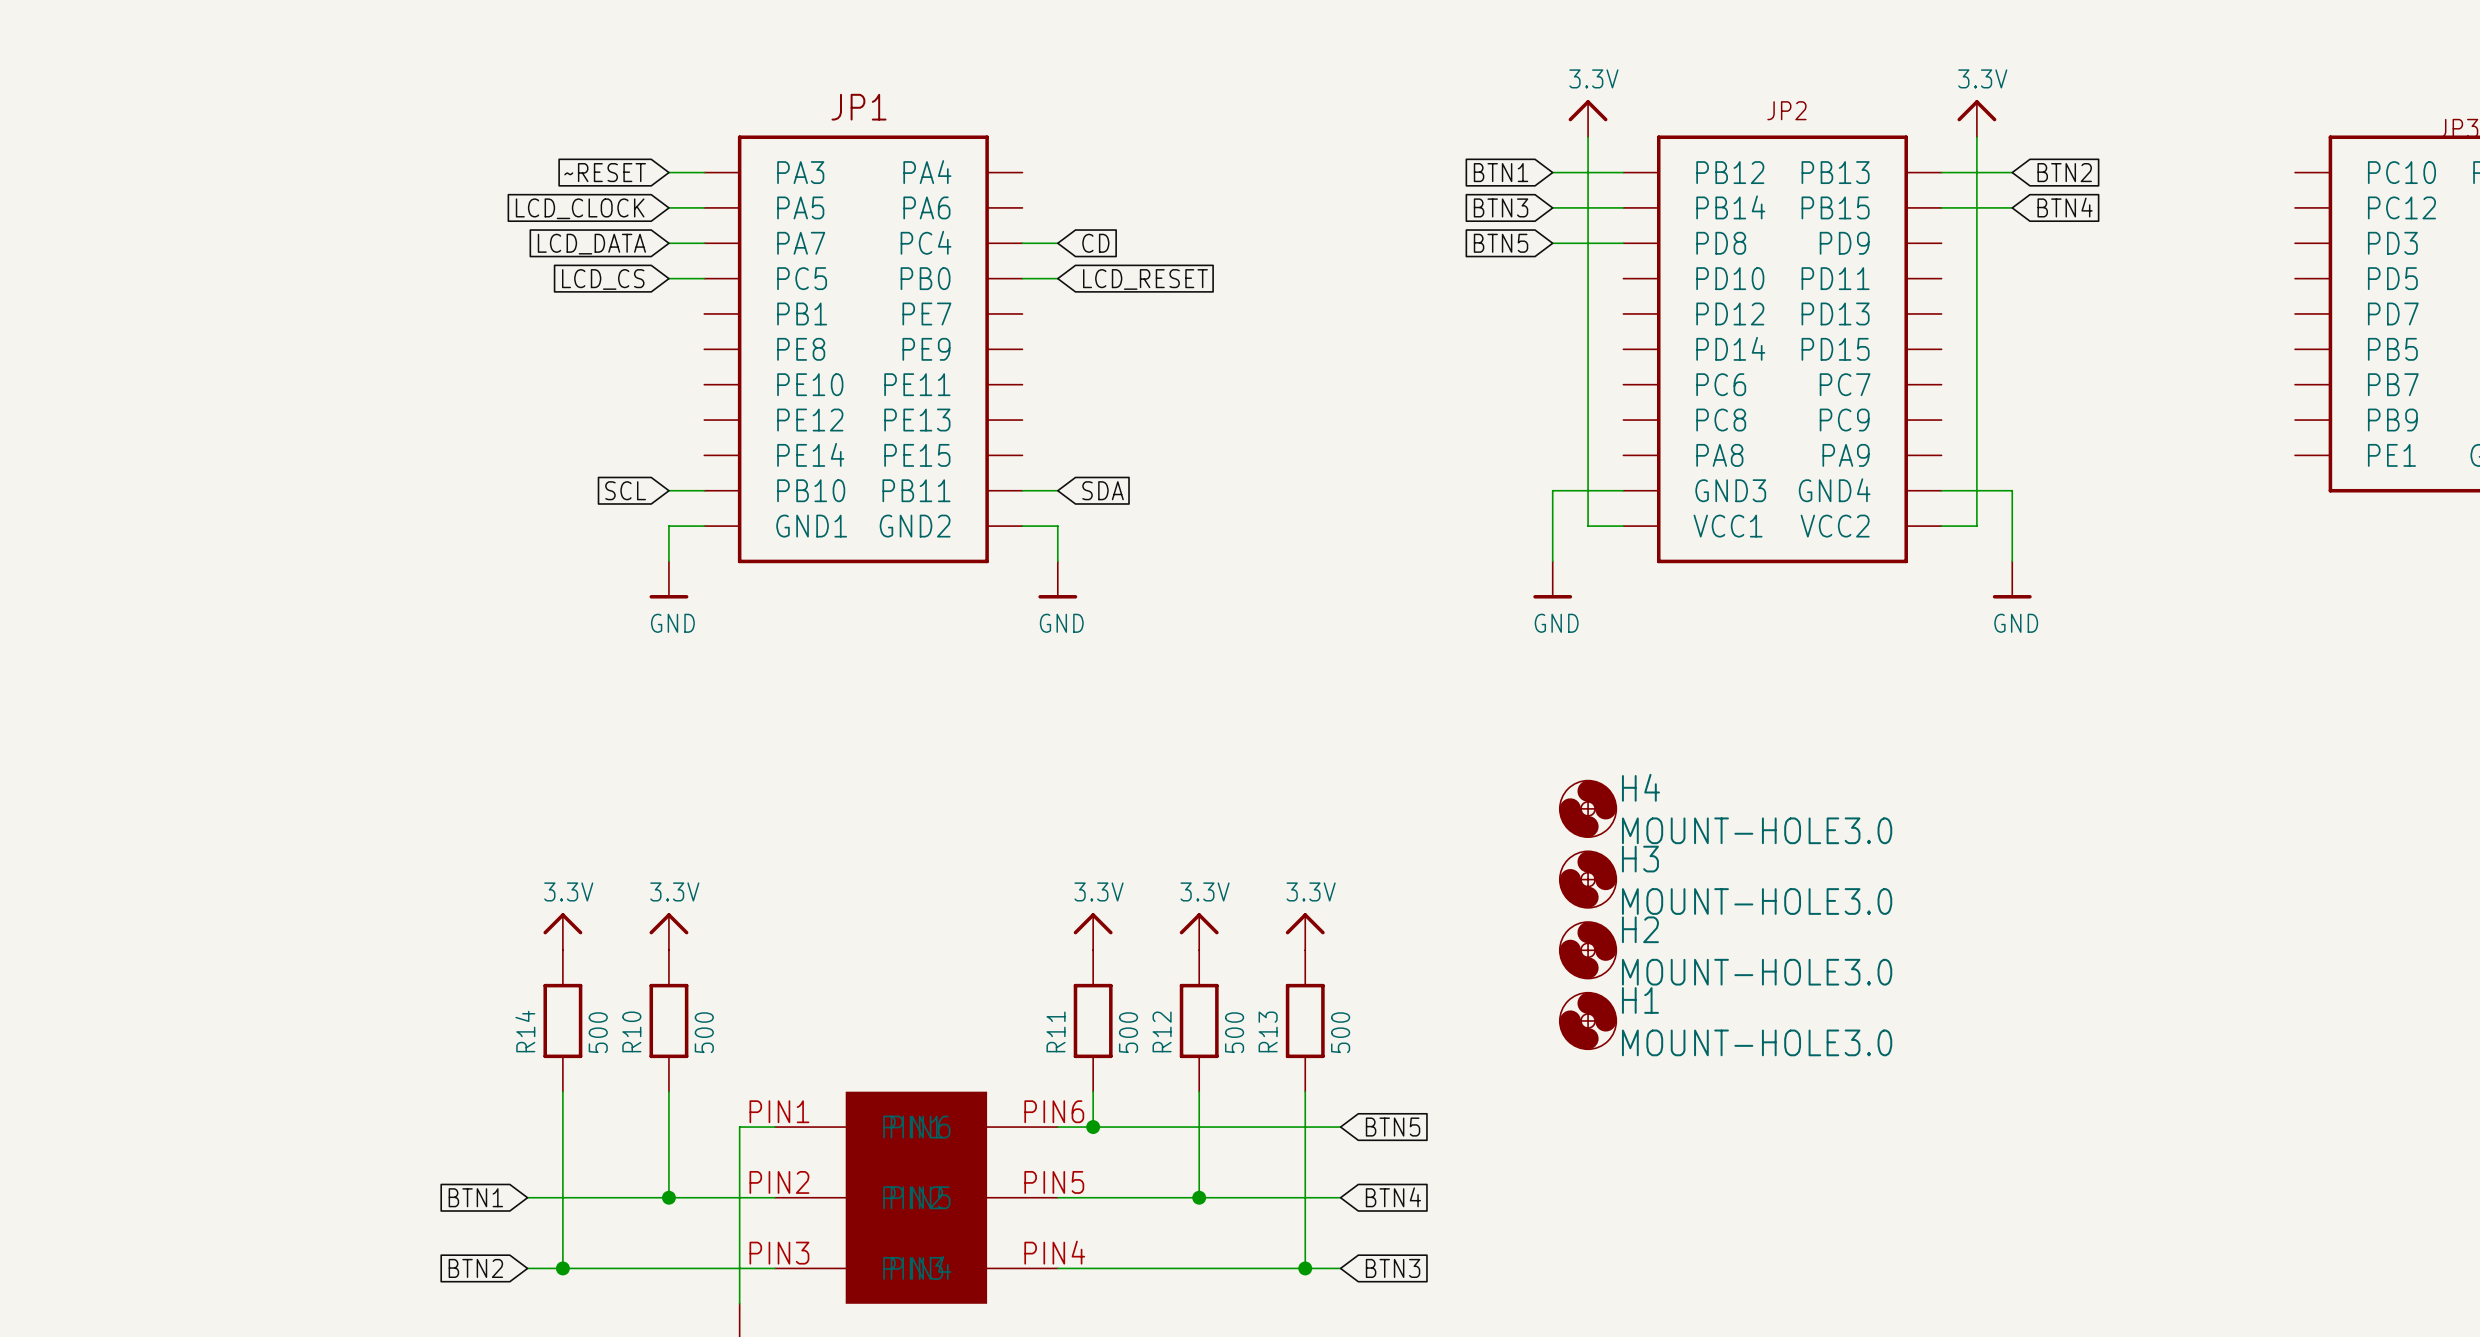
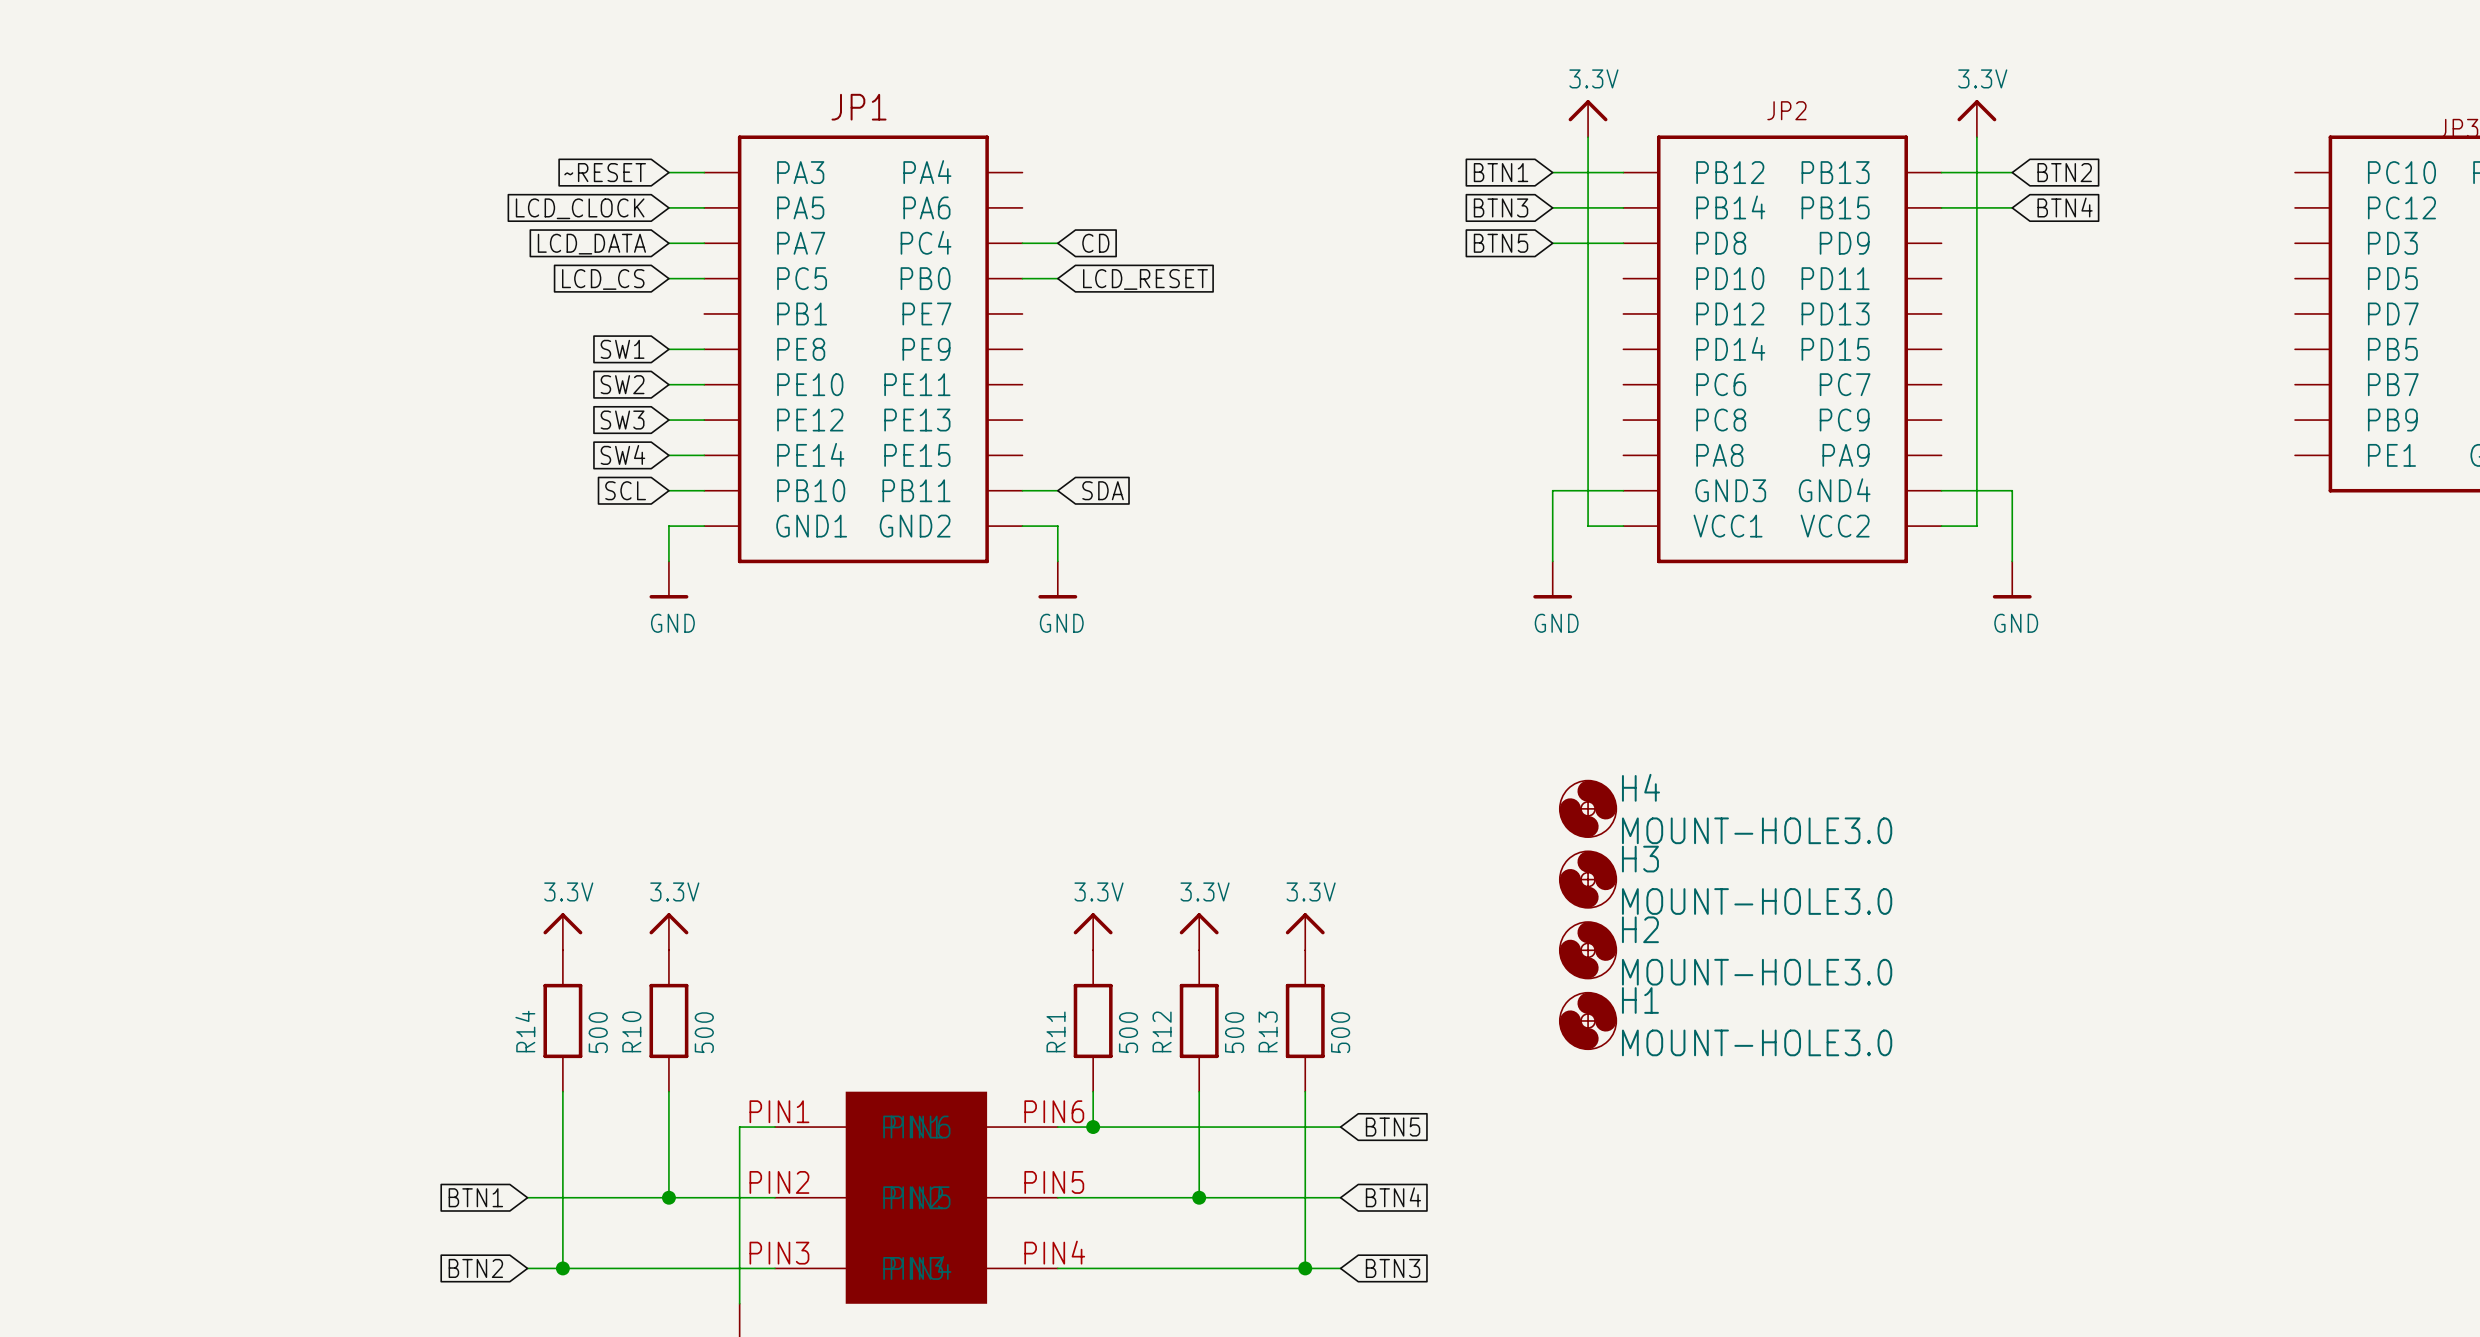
global label: none -> SW1 (622, 349)
wire: none -> (668, 349) (704, 349)
global label: none -> SW2 (622, 384)
wire: none -> (668, 384) (704, 384)
global label: none -> SW3 (622, 420)
wire: none -> (668, 420) (704, 420)
global label: none -> SW4 (622, 454)
wire: none -> (668, 455) (704, 455)

